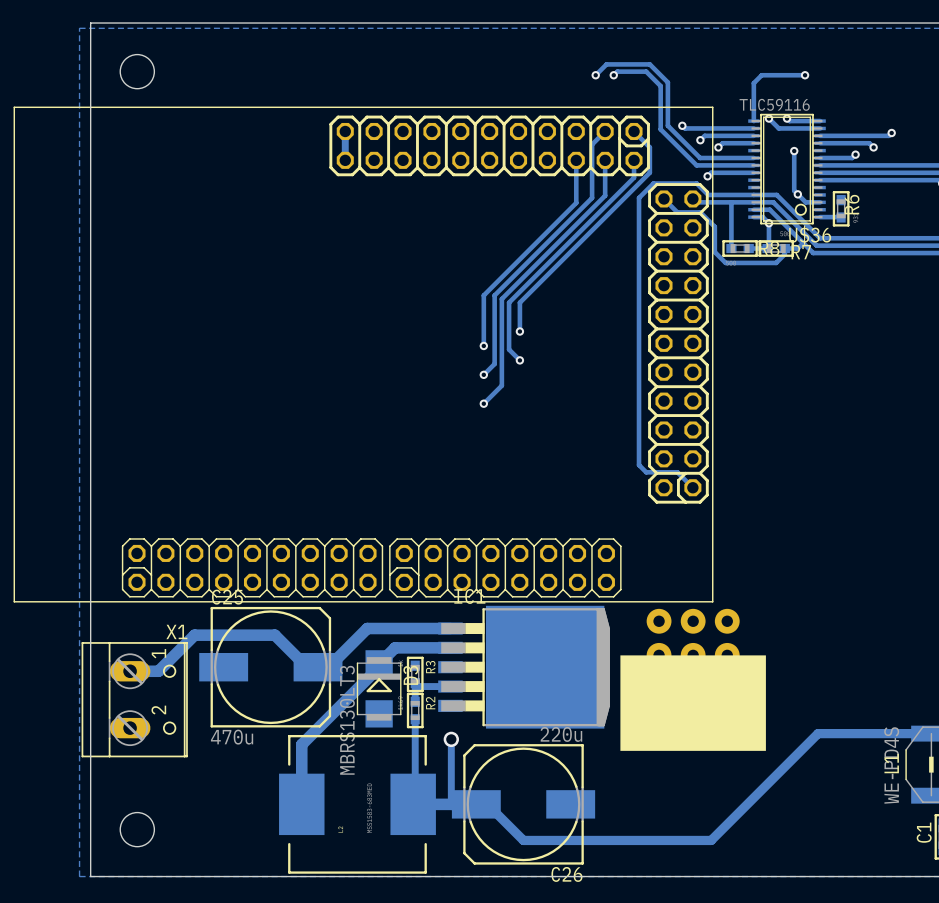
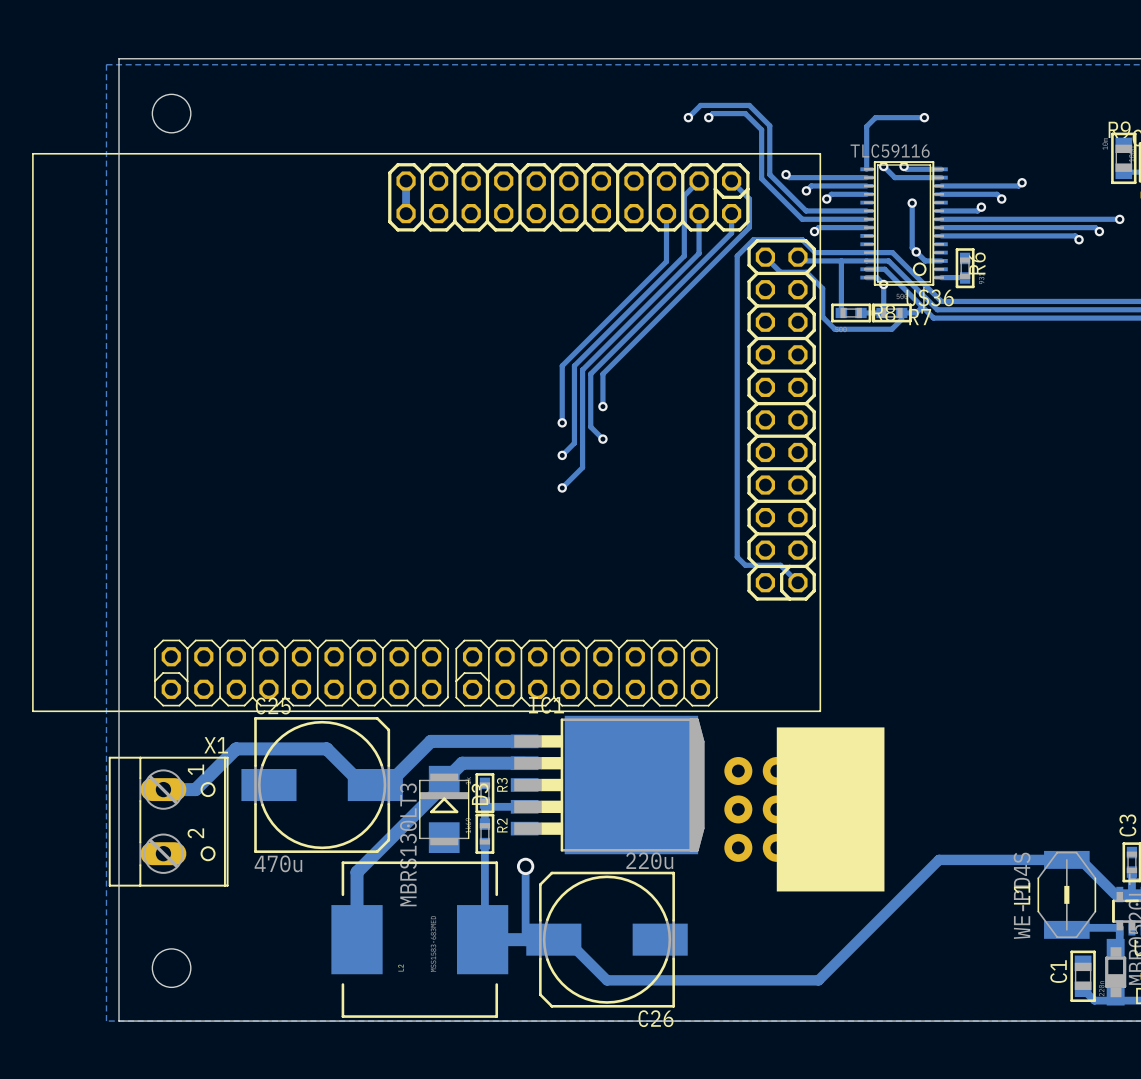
part rotation: 0° (693, 679) -> 90° counterclockwise (804, 809)

